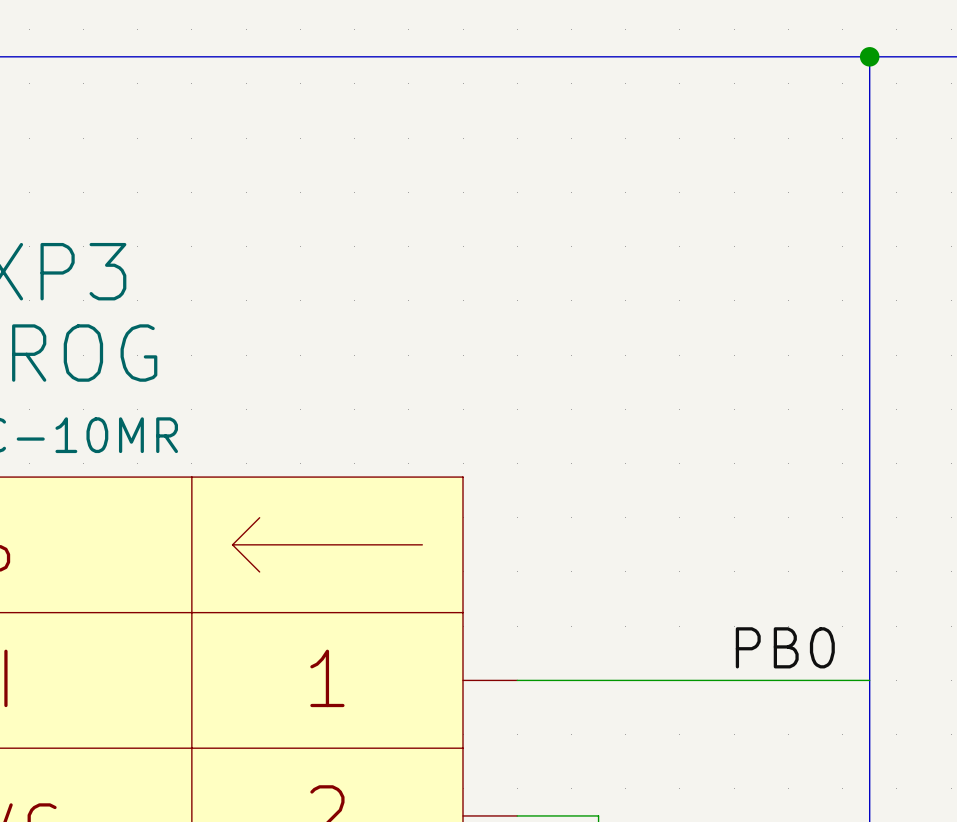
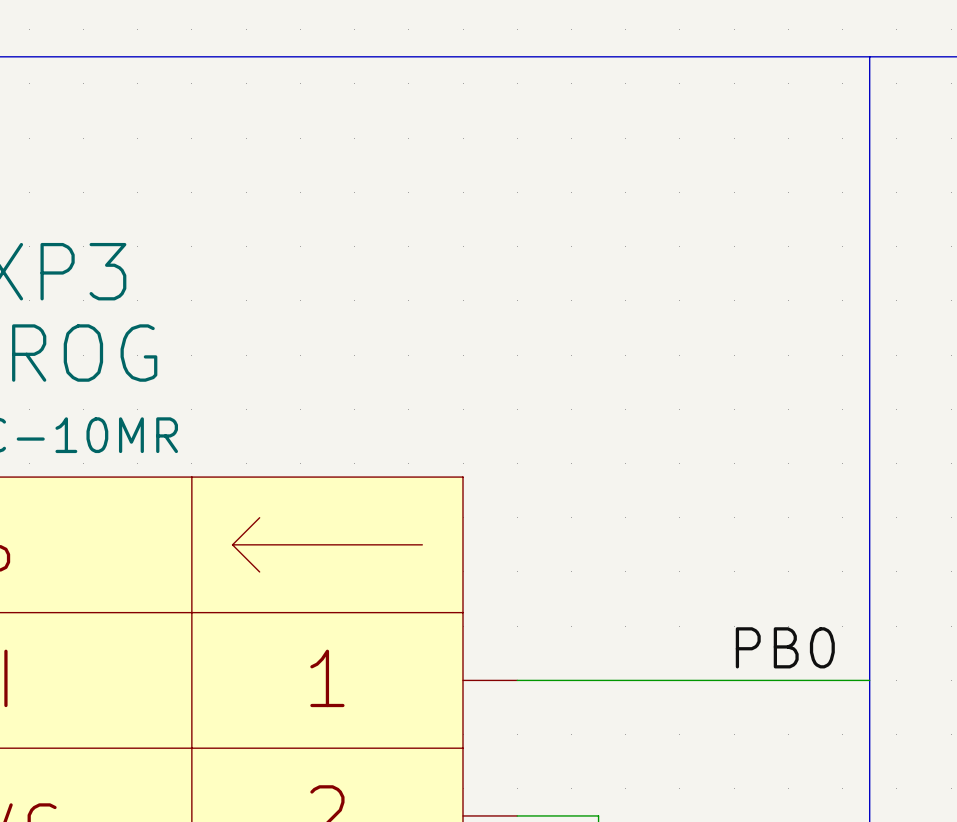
junction: (869, 56) -> none

